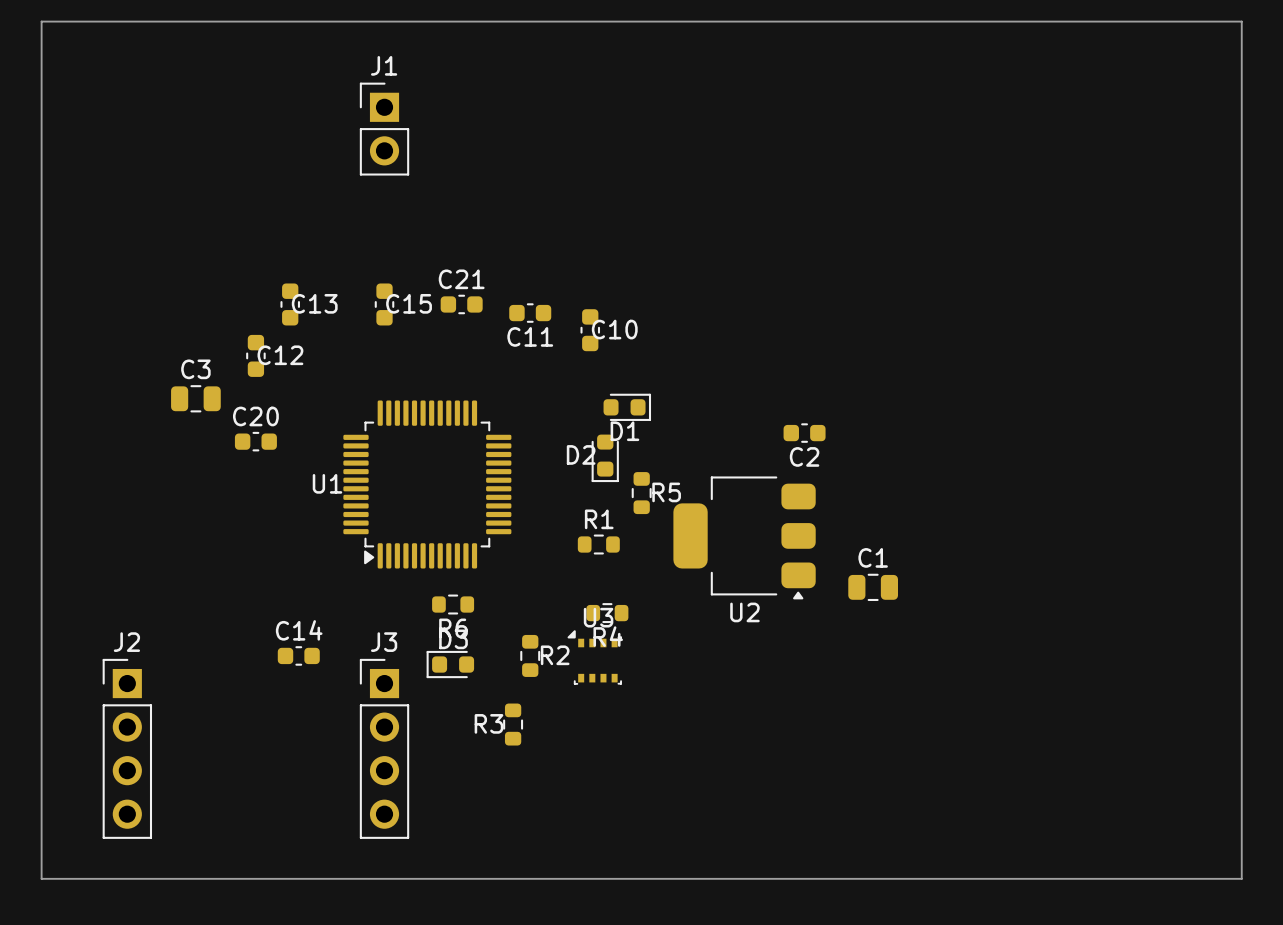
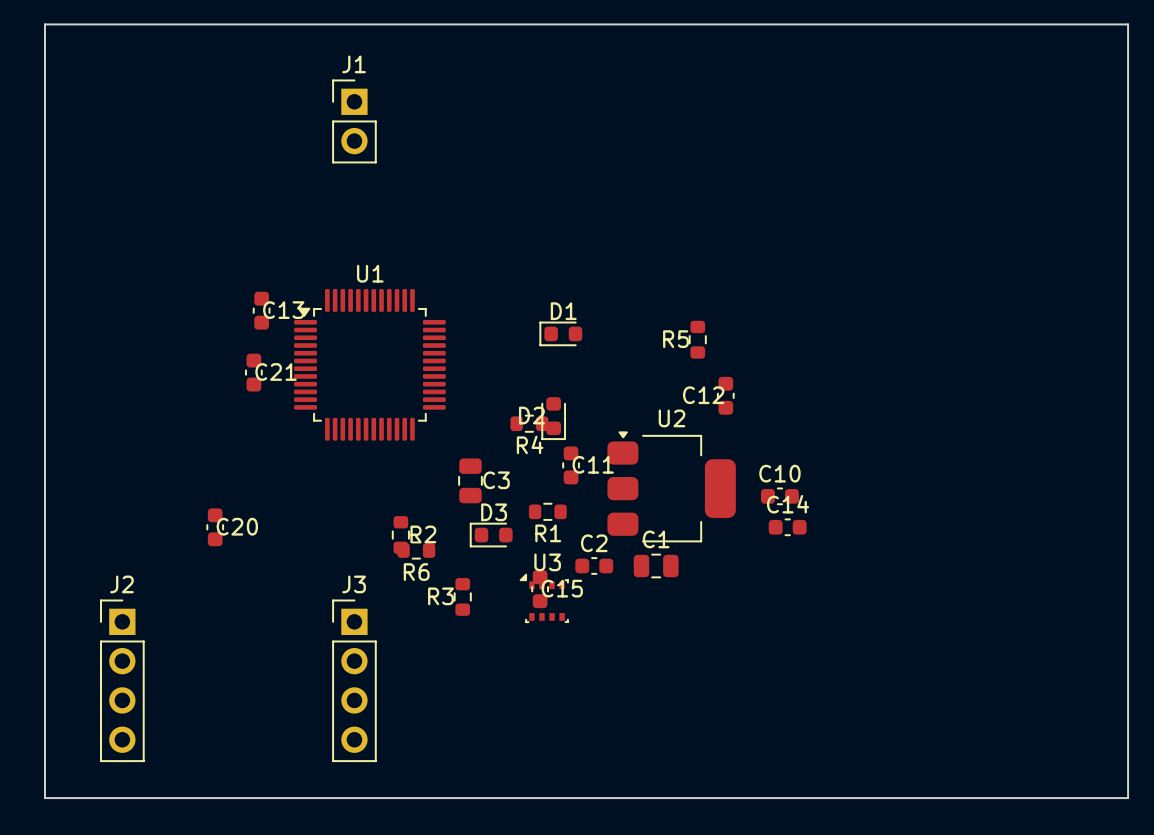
C13 position: (290, 304) -> (261, 310)
C15 position: (384, 304) -> (540, 589)
C21 rotation: 0° (461, 304) -> 90° clockwise (253, 372)
C21 position: (461, 304) -> (253, 372)
C11 rotation: 0° (530, 313) -> 90° clockwise (571, 465)
C11 position: (530, 313) -> (571, 465)
C10 name position: C10 (614, 329) -> C10 (779, 473)
C10 rotation: 0° (590, 330) -> 90° clockwise (779, 496)
C10 position: (590, 330) -> (779, 496)
C11 name position: C11 (530, 336) -> C11 (593, 464)
C12 position: (255, 355) -> (725, 395)
C12 name position: C12 (280, 355) -> C12 (703, 395)
C3 rotation: 0° (195, 398) -> 90° clockwise (470, 480)
C3 position: (195, 398) -> (470, 480)
D1 rotation: 0° (627, 407) -> 180° (560, 333)
D1 position: (627, 407) -> (560, 333)
C2 position: (804, 433) -> (594, 565)
C20 rotation: 0° (255, 441) -> 90° clockwise (215, 527)
C20 position: (255, 441) -> (215, 527)
C2 name position: C2 (804, 456) -> C2 (594, 543)
U1 rotation: 0° (427, 484) -> 90° clockwise (369, 364)
R5 name position: R5 (666, 492) -> R5 (676, 339)
R5 position: (641, 493) -> (697, 339)
R1 name position: R1 (599, 519) -> R1 (548, 533)
U2 rotation: 0° (744, 537) -> 180° (671, 486)
R1 position: (598, 544) -> (547, 511)
C1 position: (873, 587) -> (656, 565)
R4 position: (607, 613) -> (529, 423)
C14 position: (298, 655) -> (787, 527)
R2 position: (530, 655) -> (400, 535)
D3 position: (450, 664) -> (491, 535)
R3 position: (513, 724) -> (462, 596)

